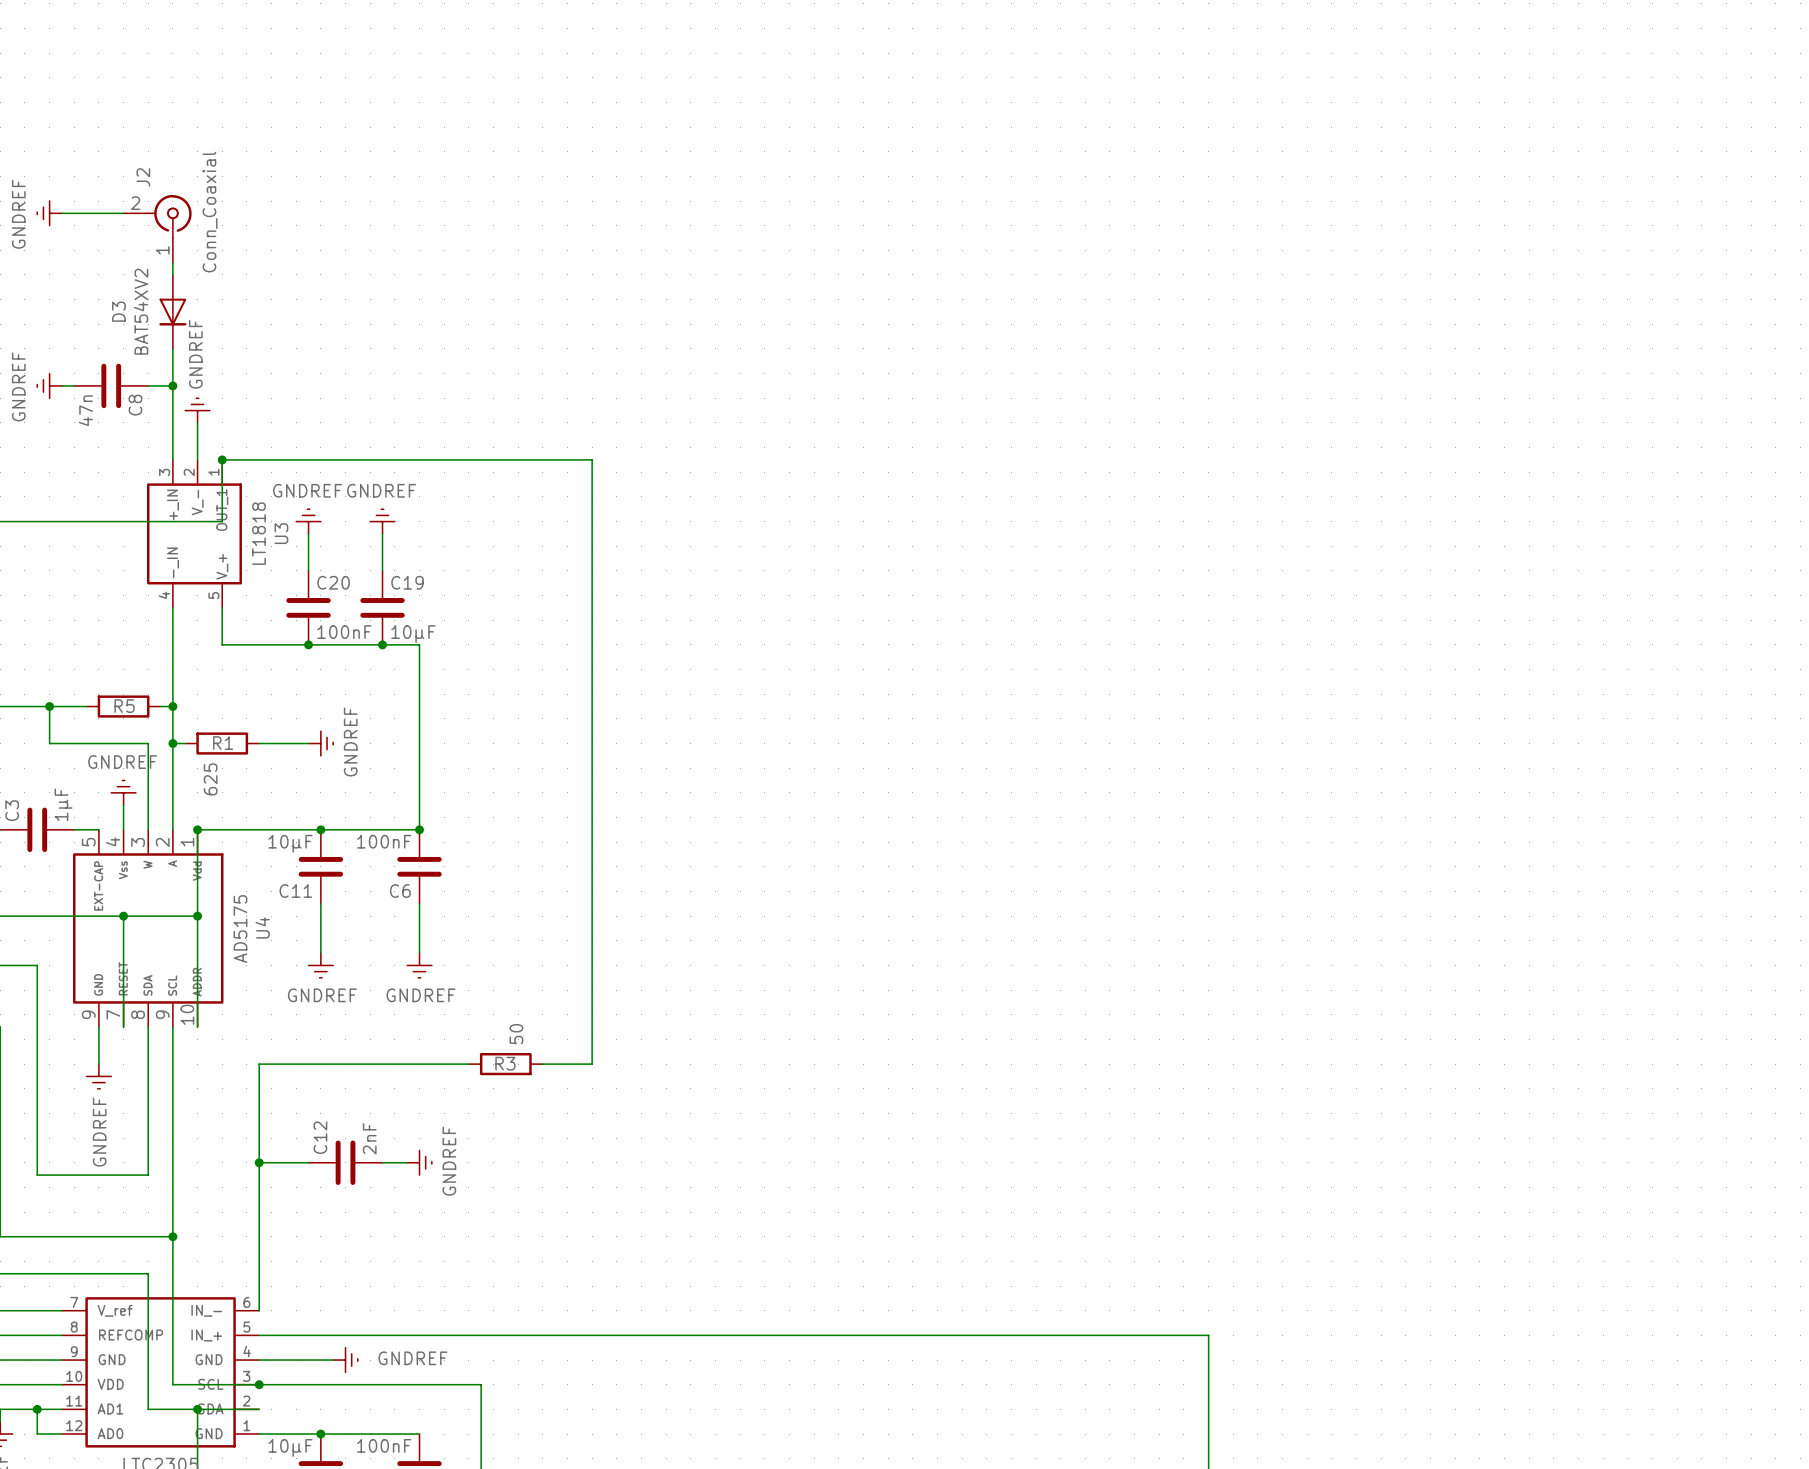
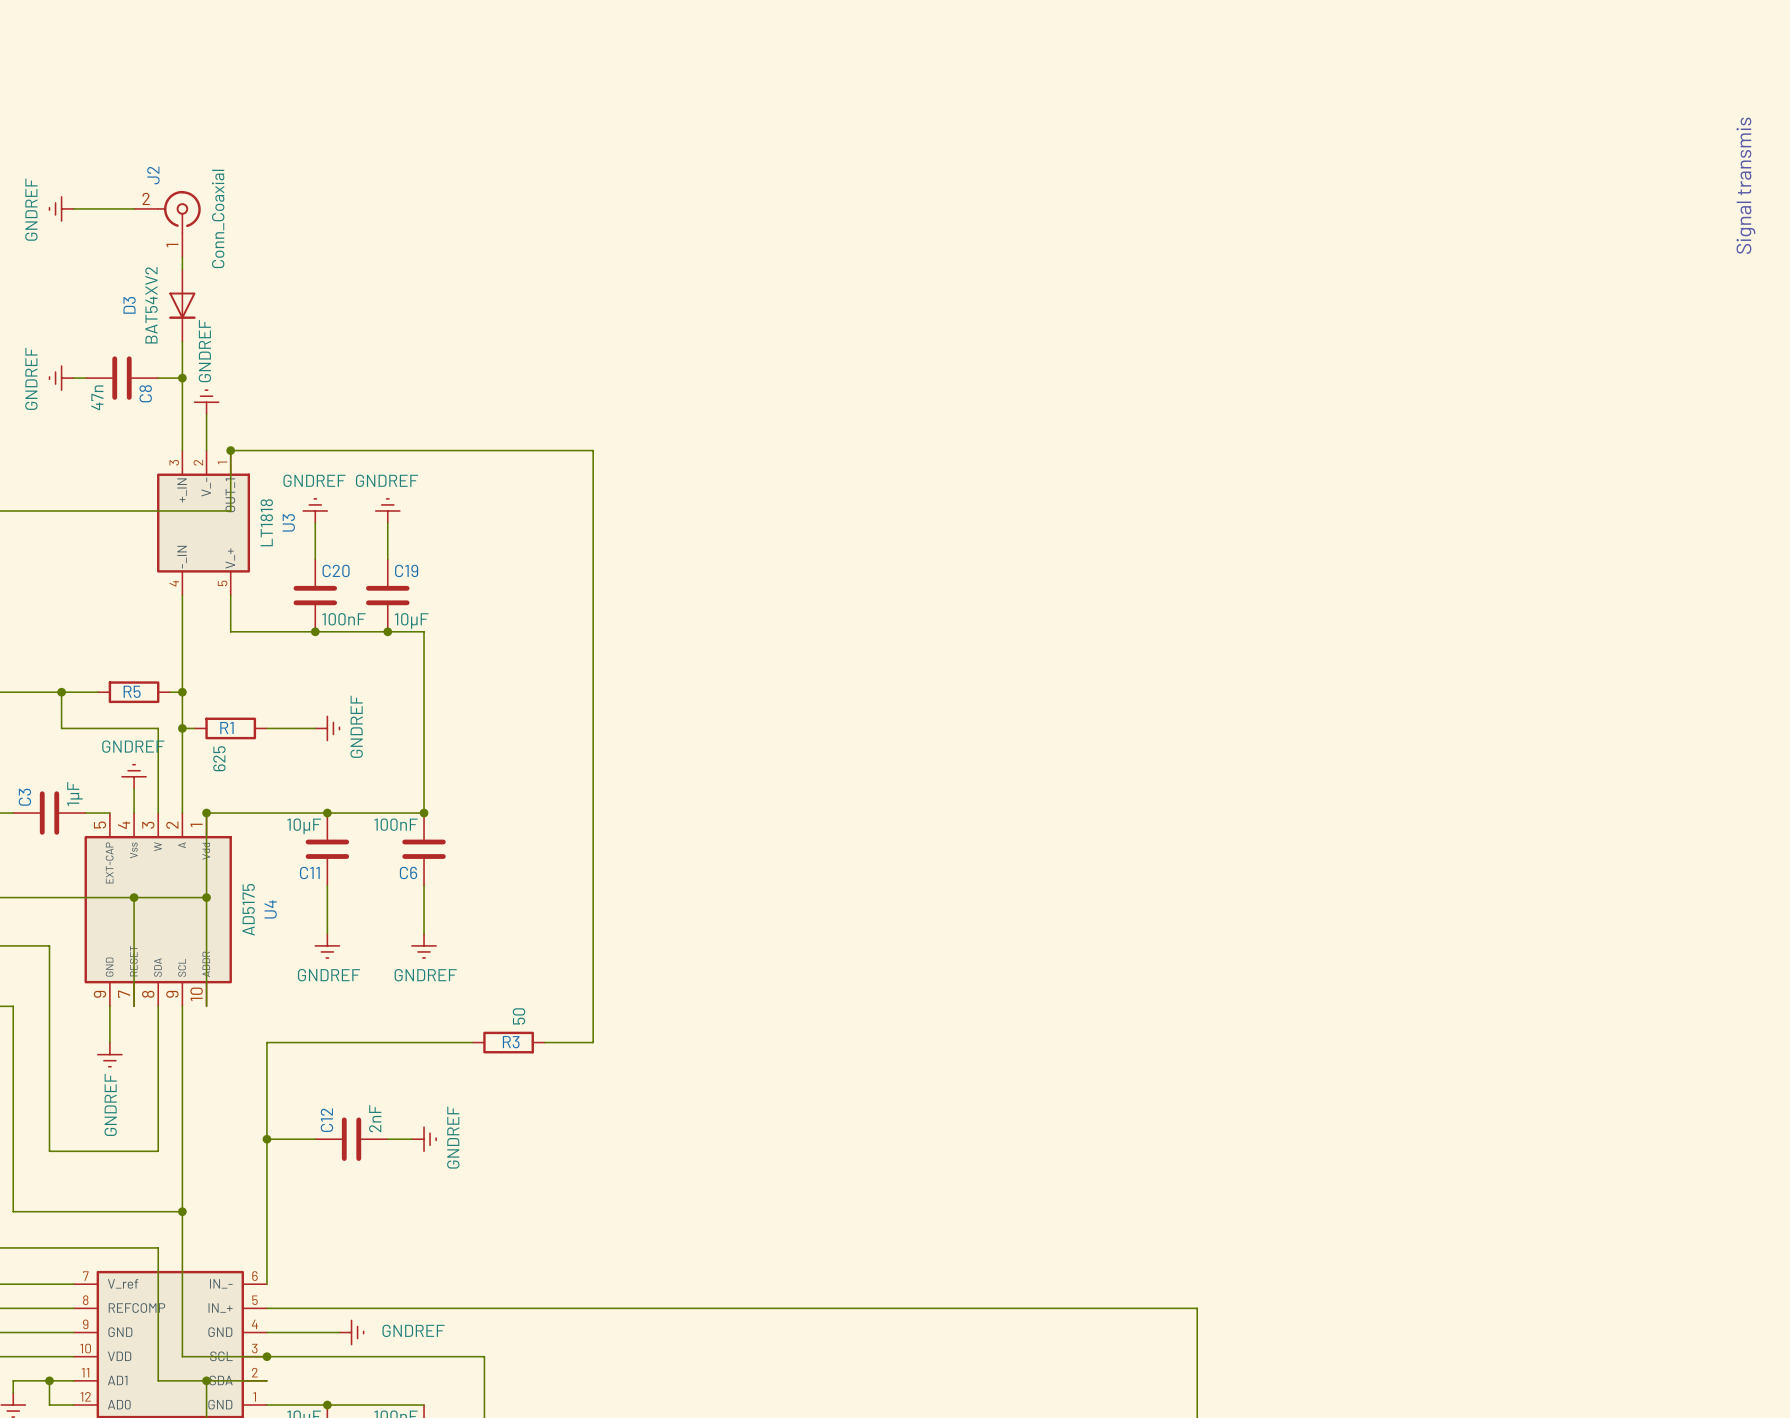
text: none -> Signal transmis (1745, 185)

